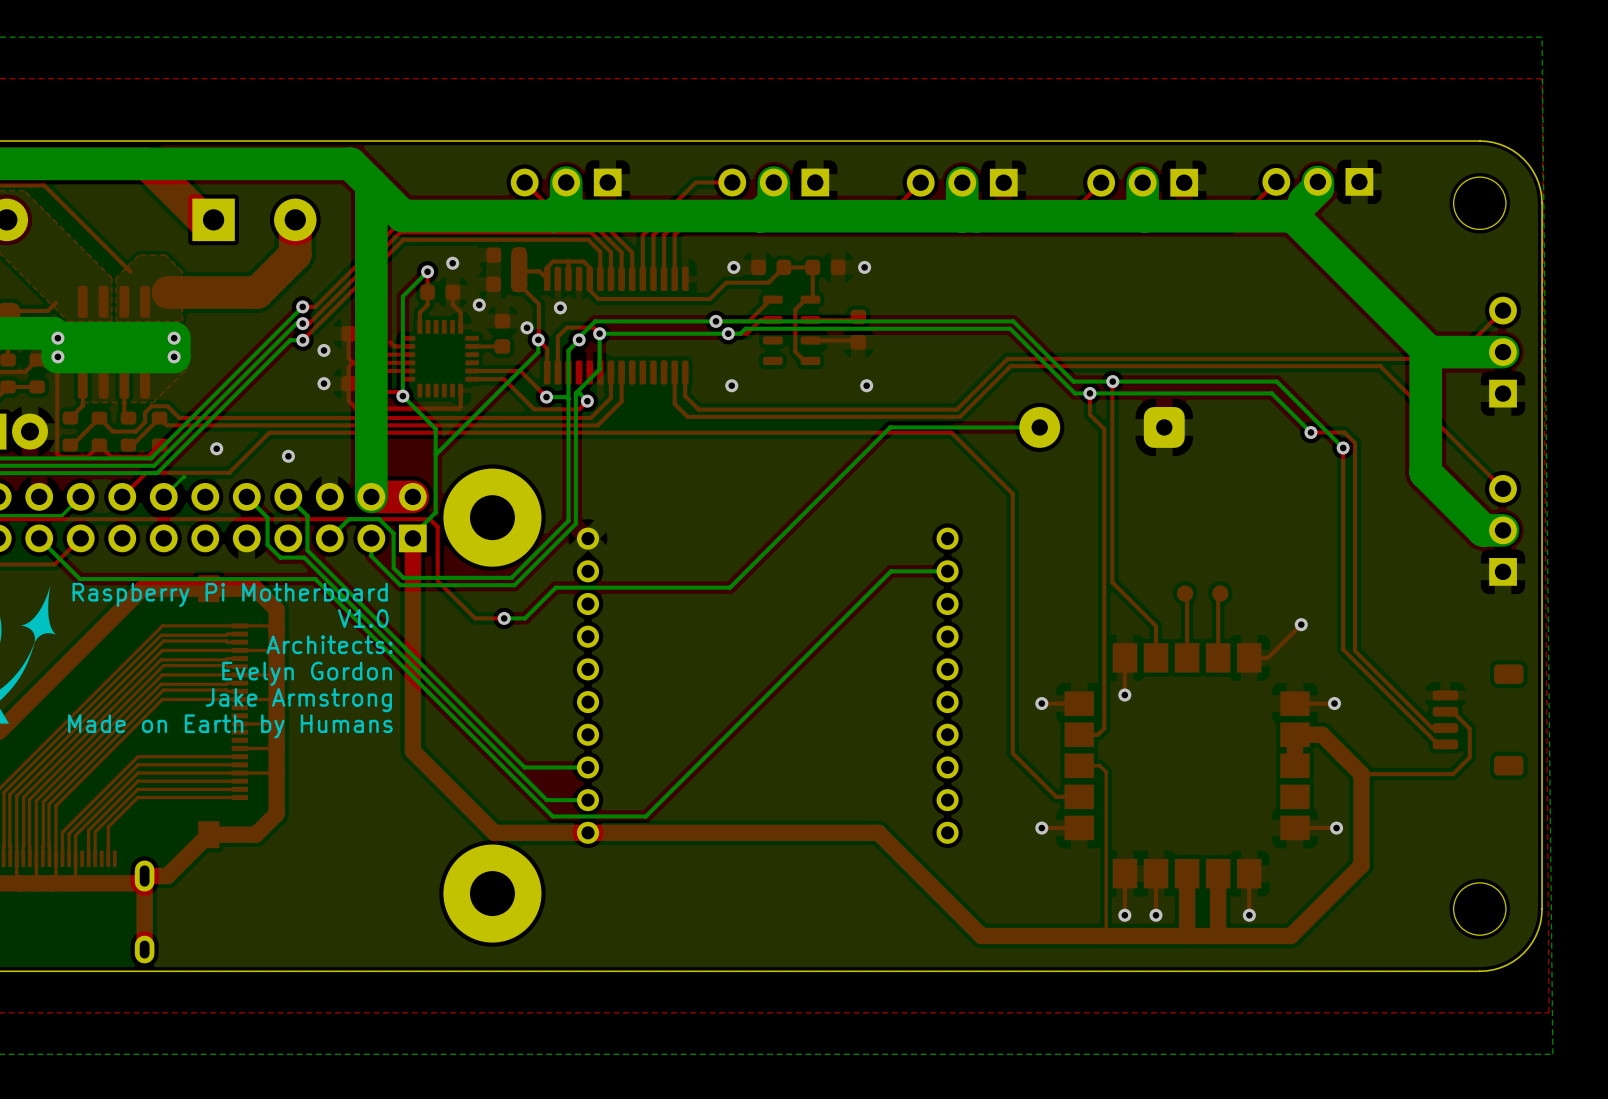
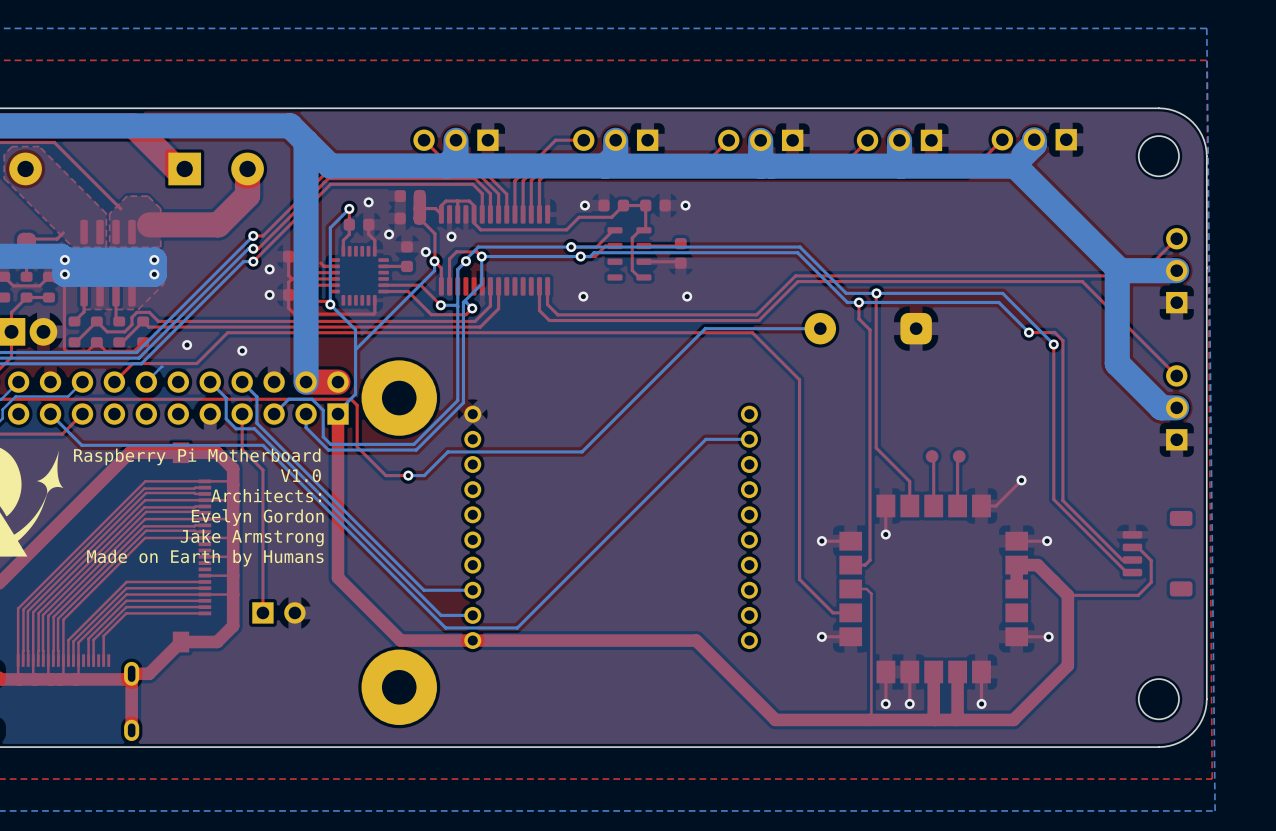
top track: none -> (242, 414) (242, 449) (262, 470) (262, 612)
part: none -> (278, 612)

